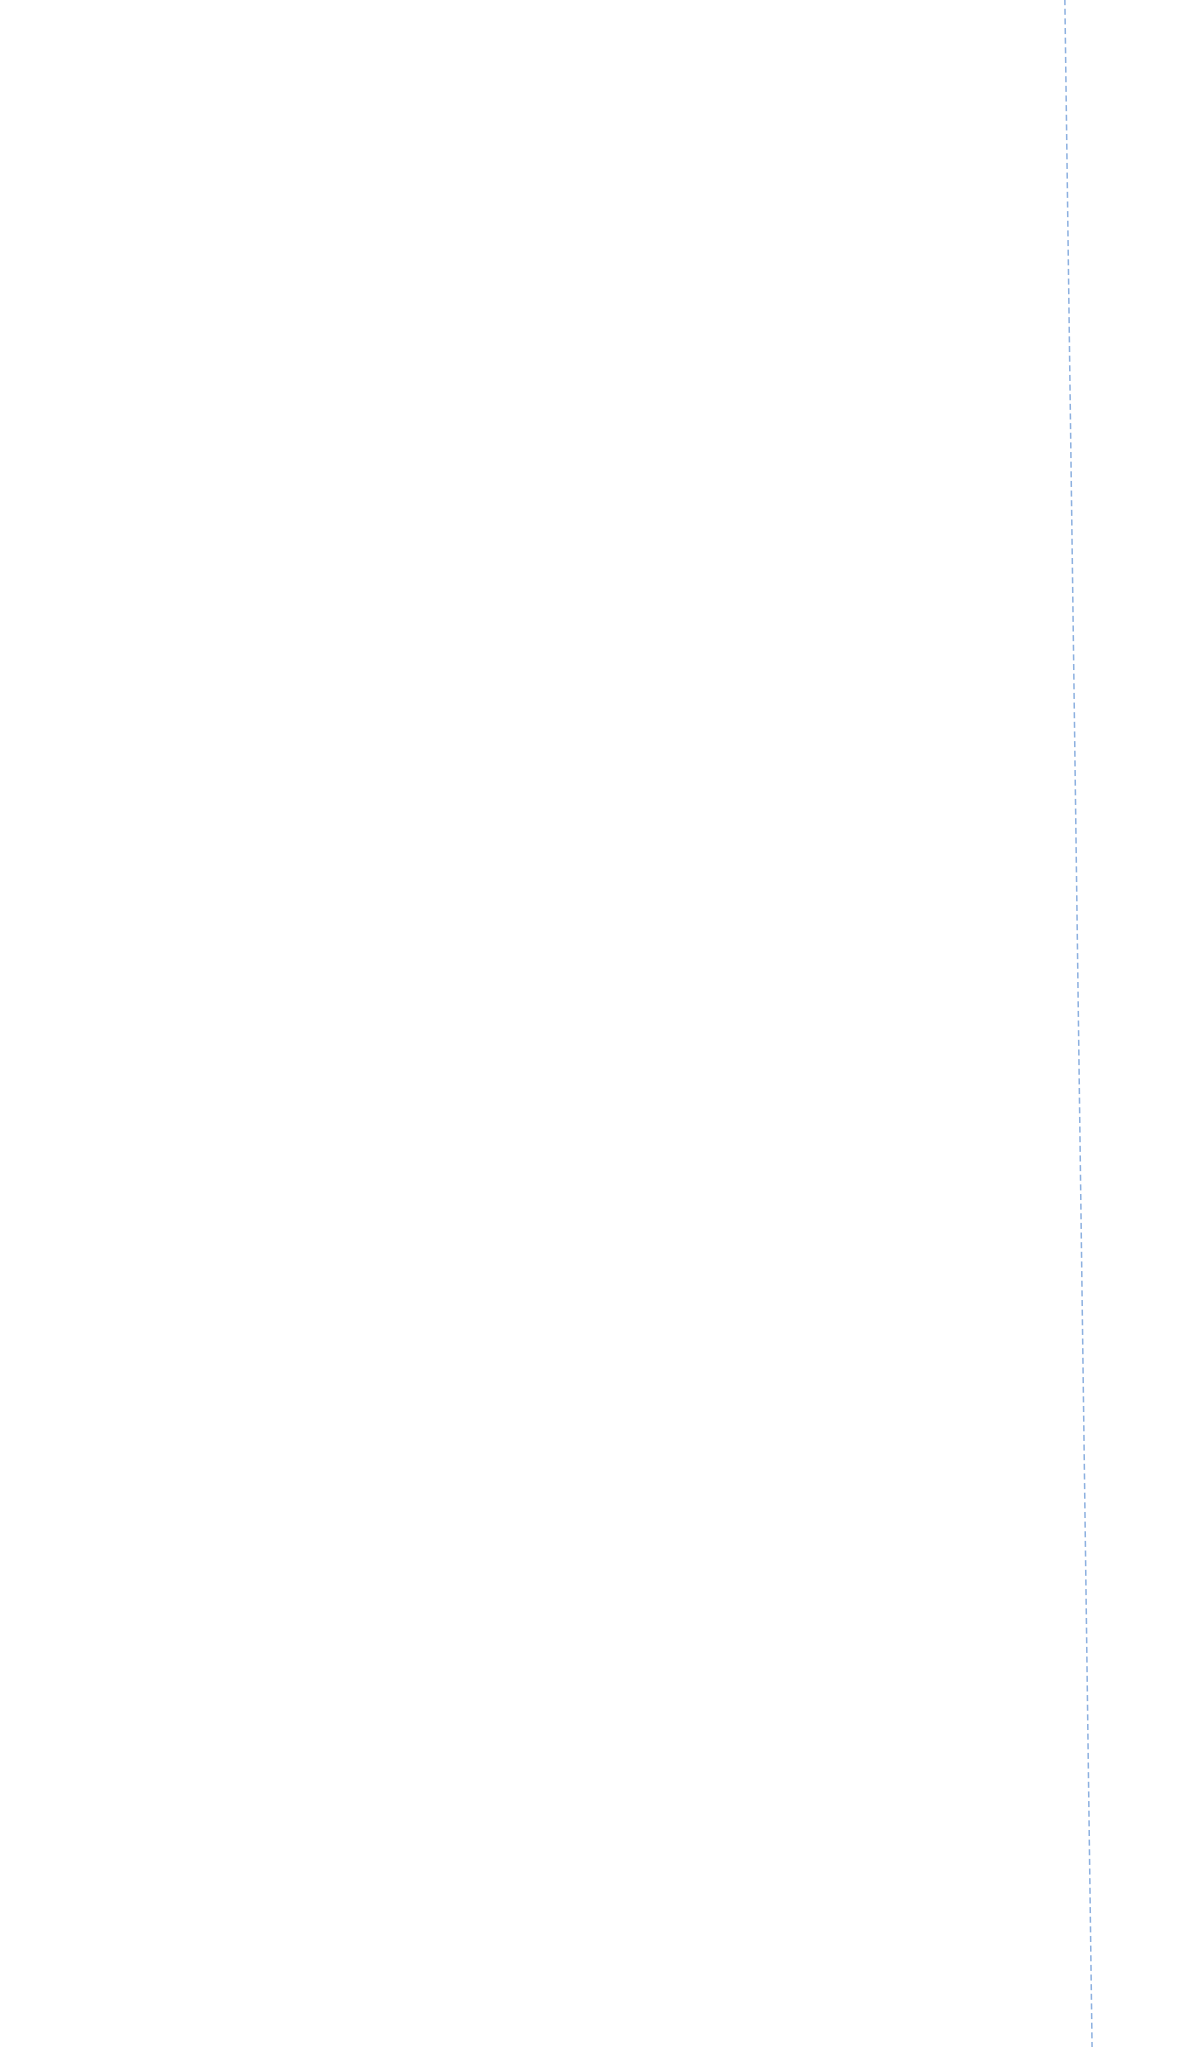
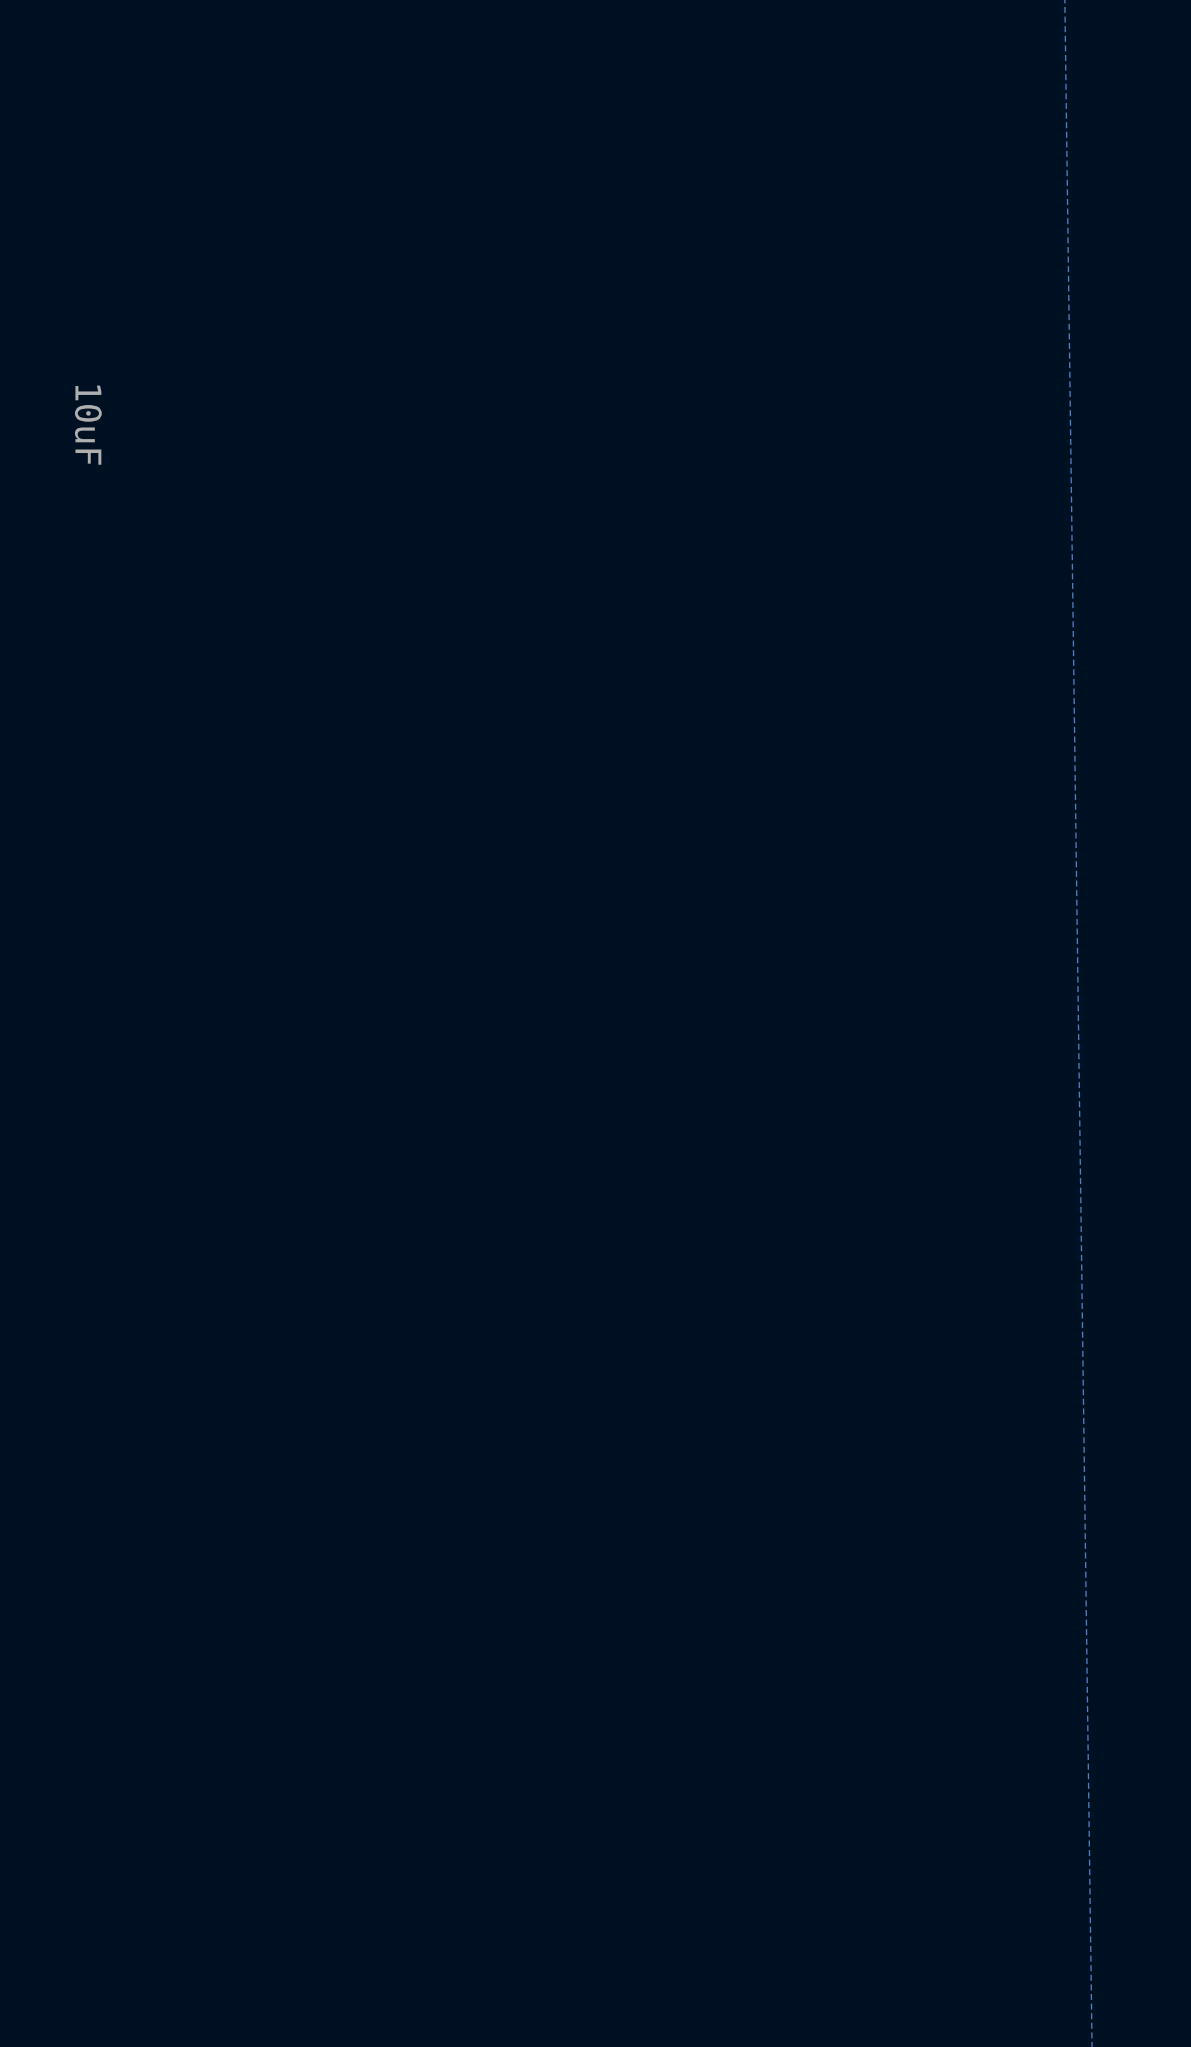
part: none -> 10uF (88, 425)

